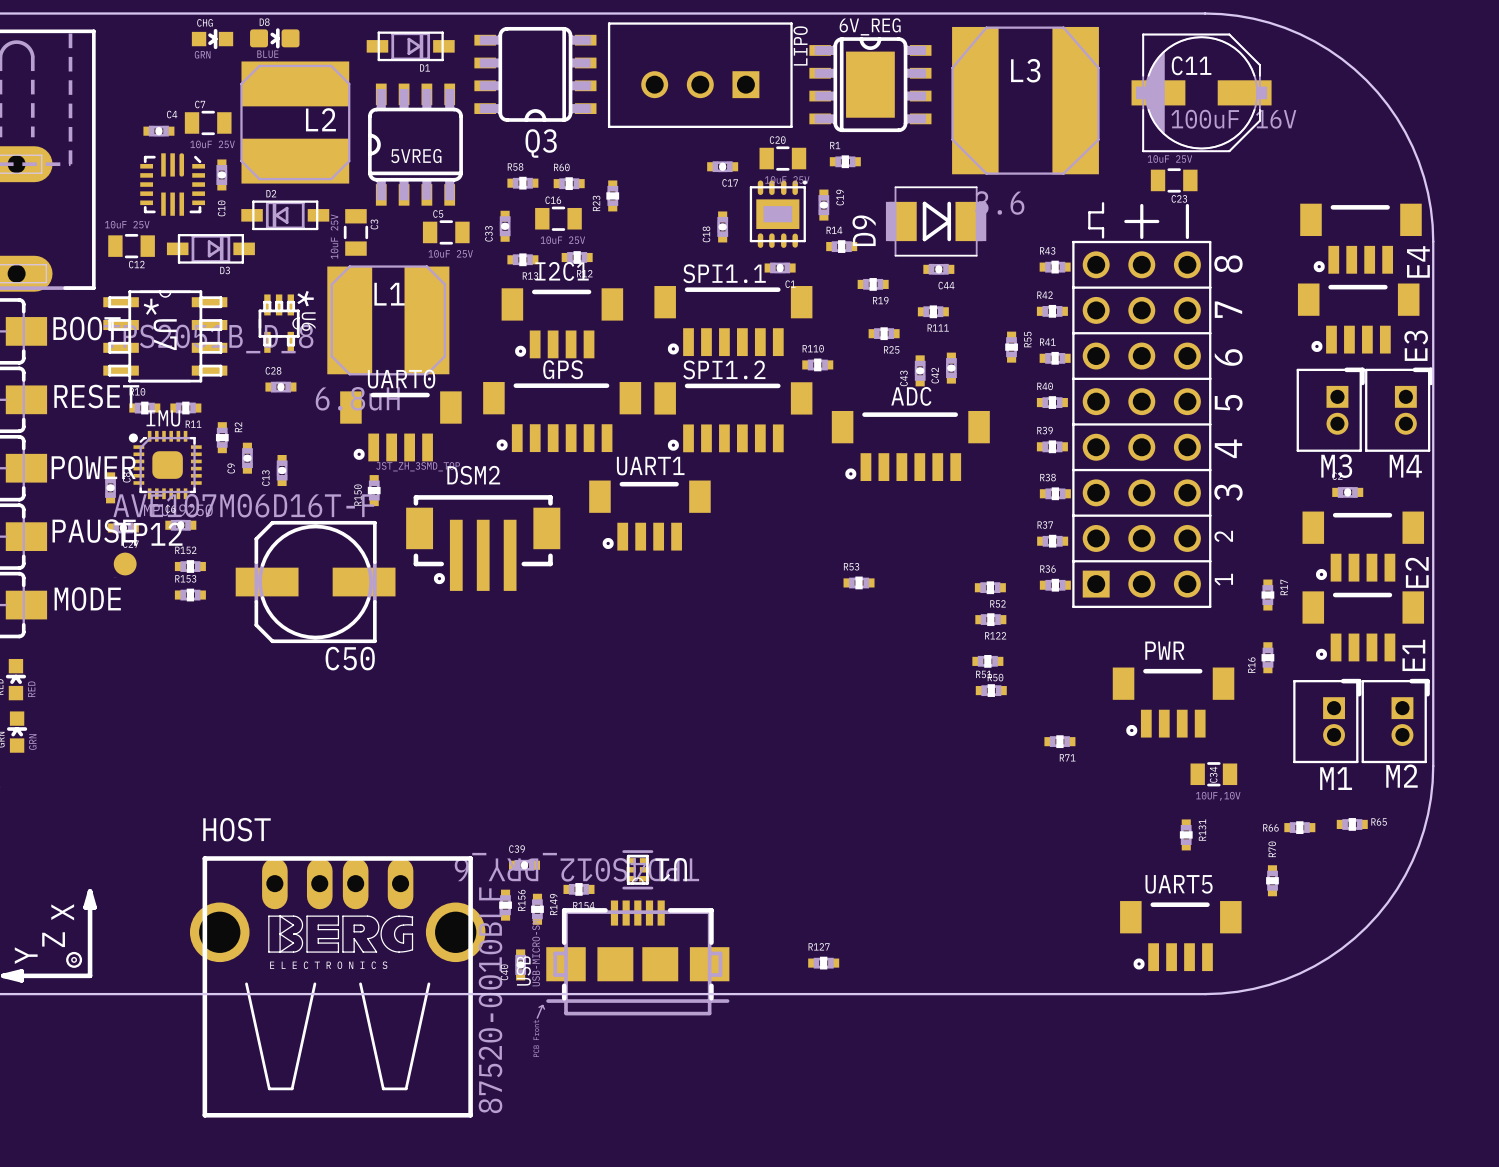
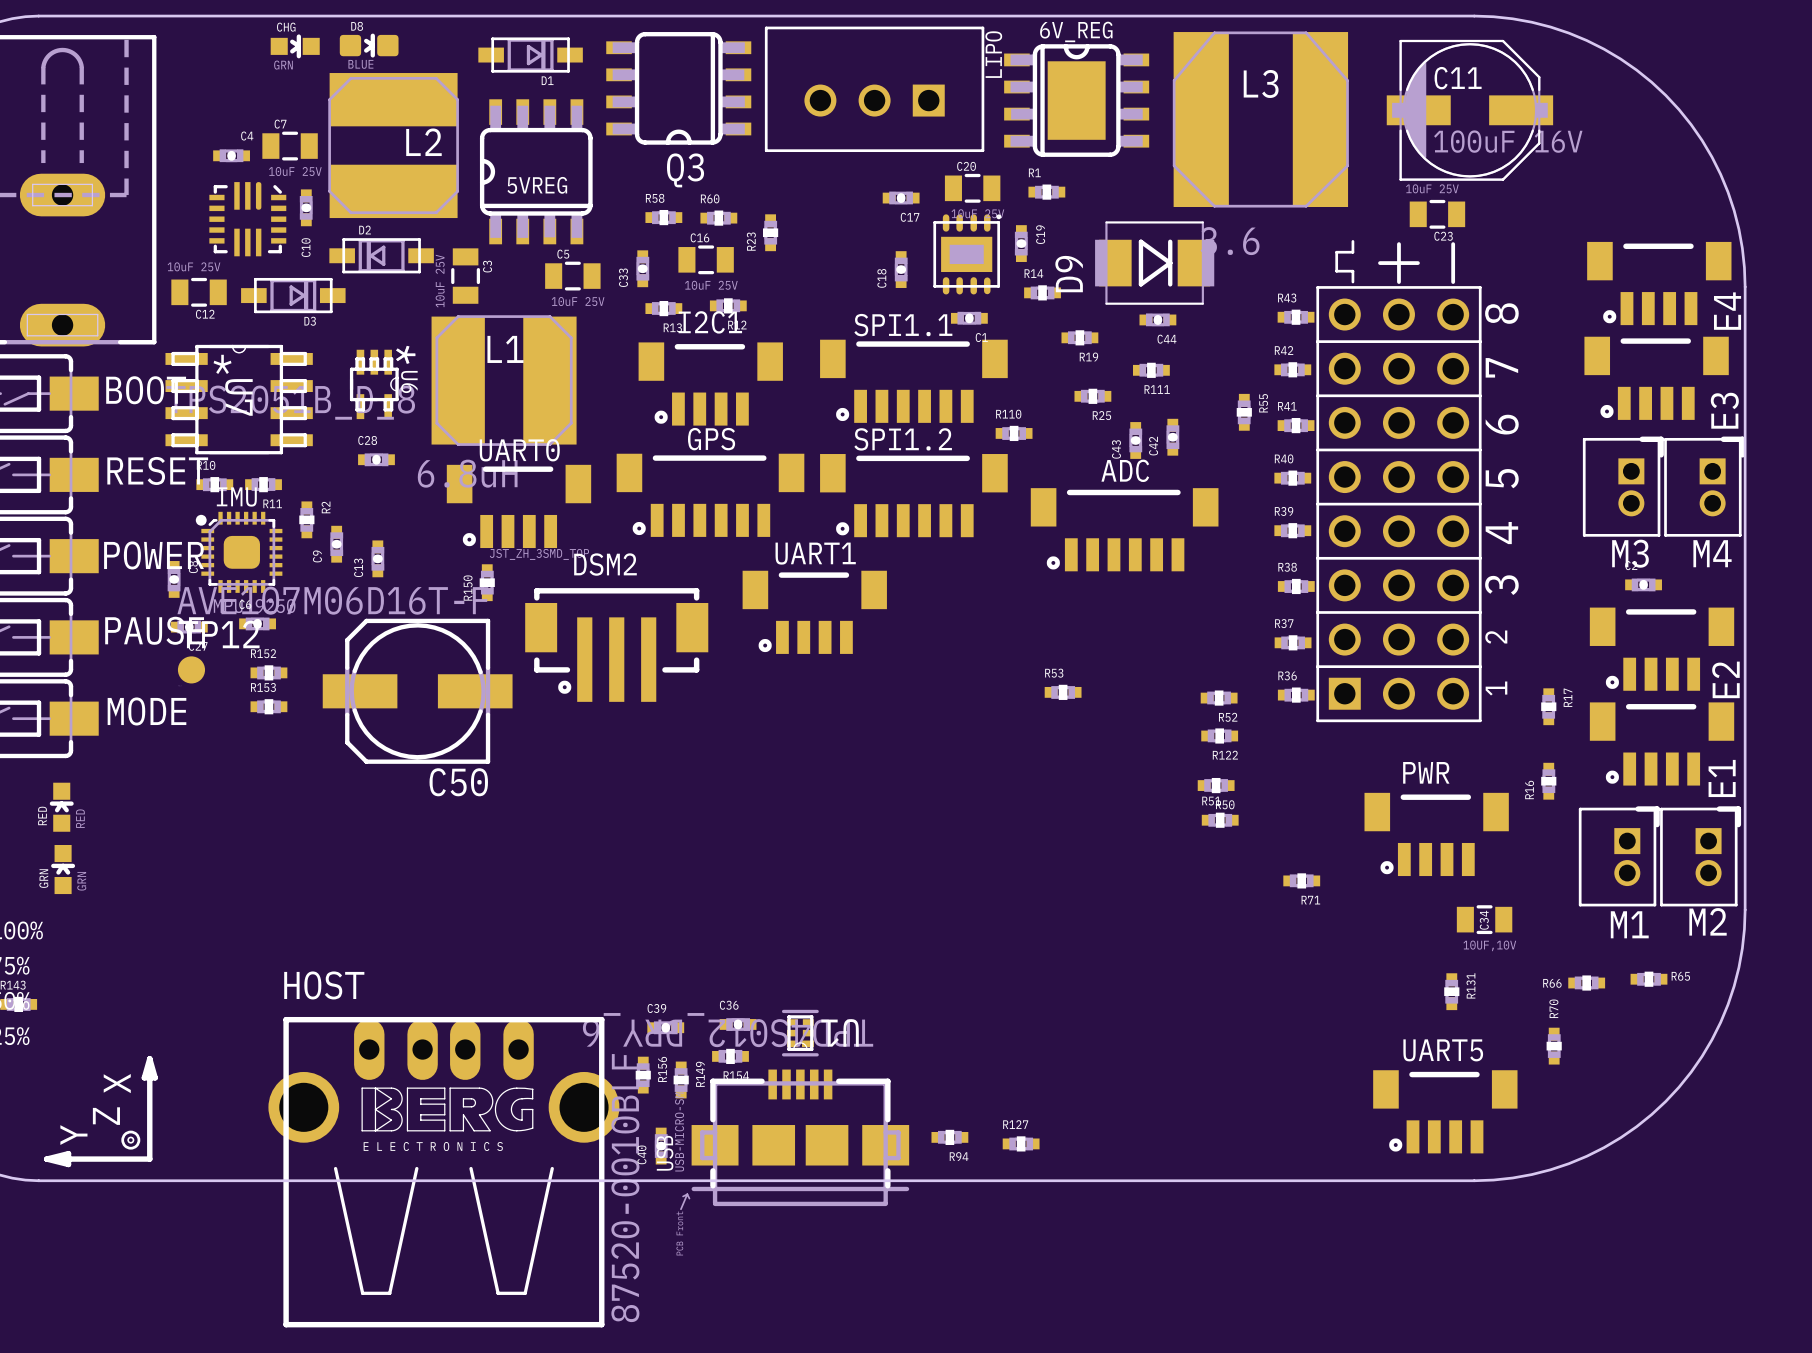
C36: none -> (738, 1024)
R94: none -> (949, 1137)

